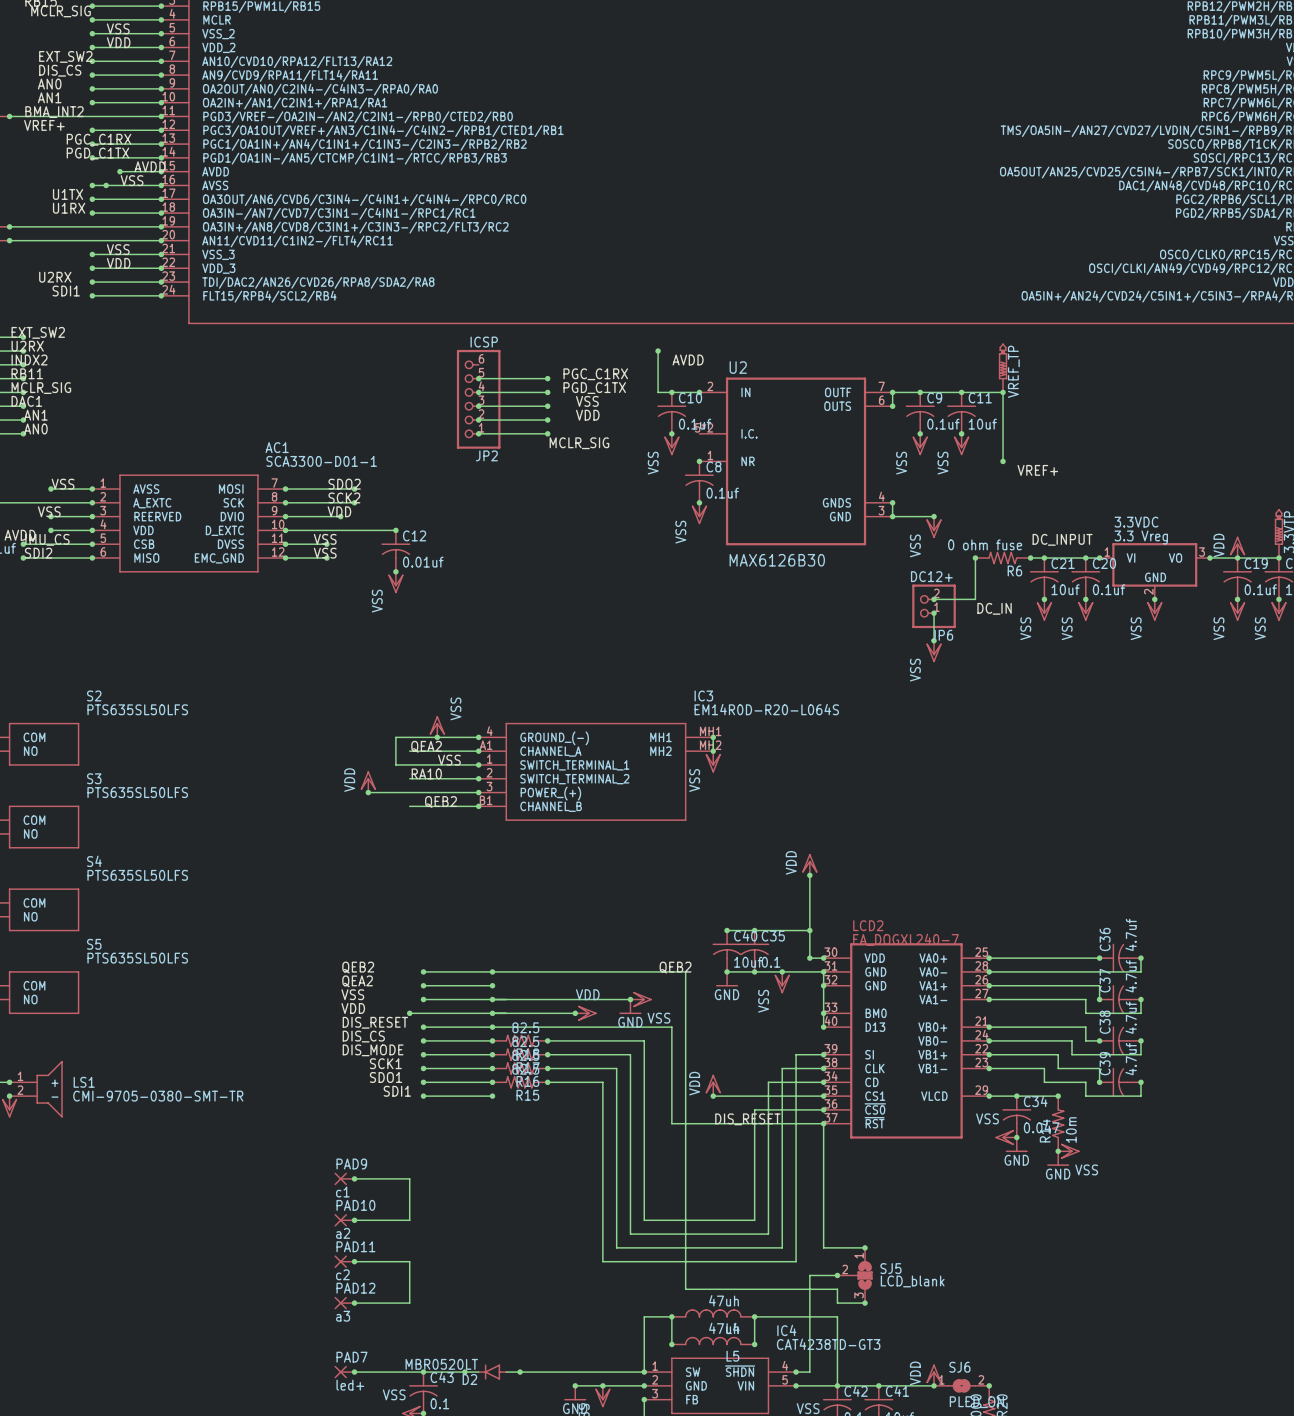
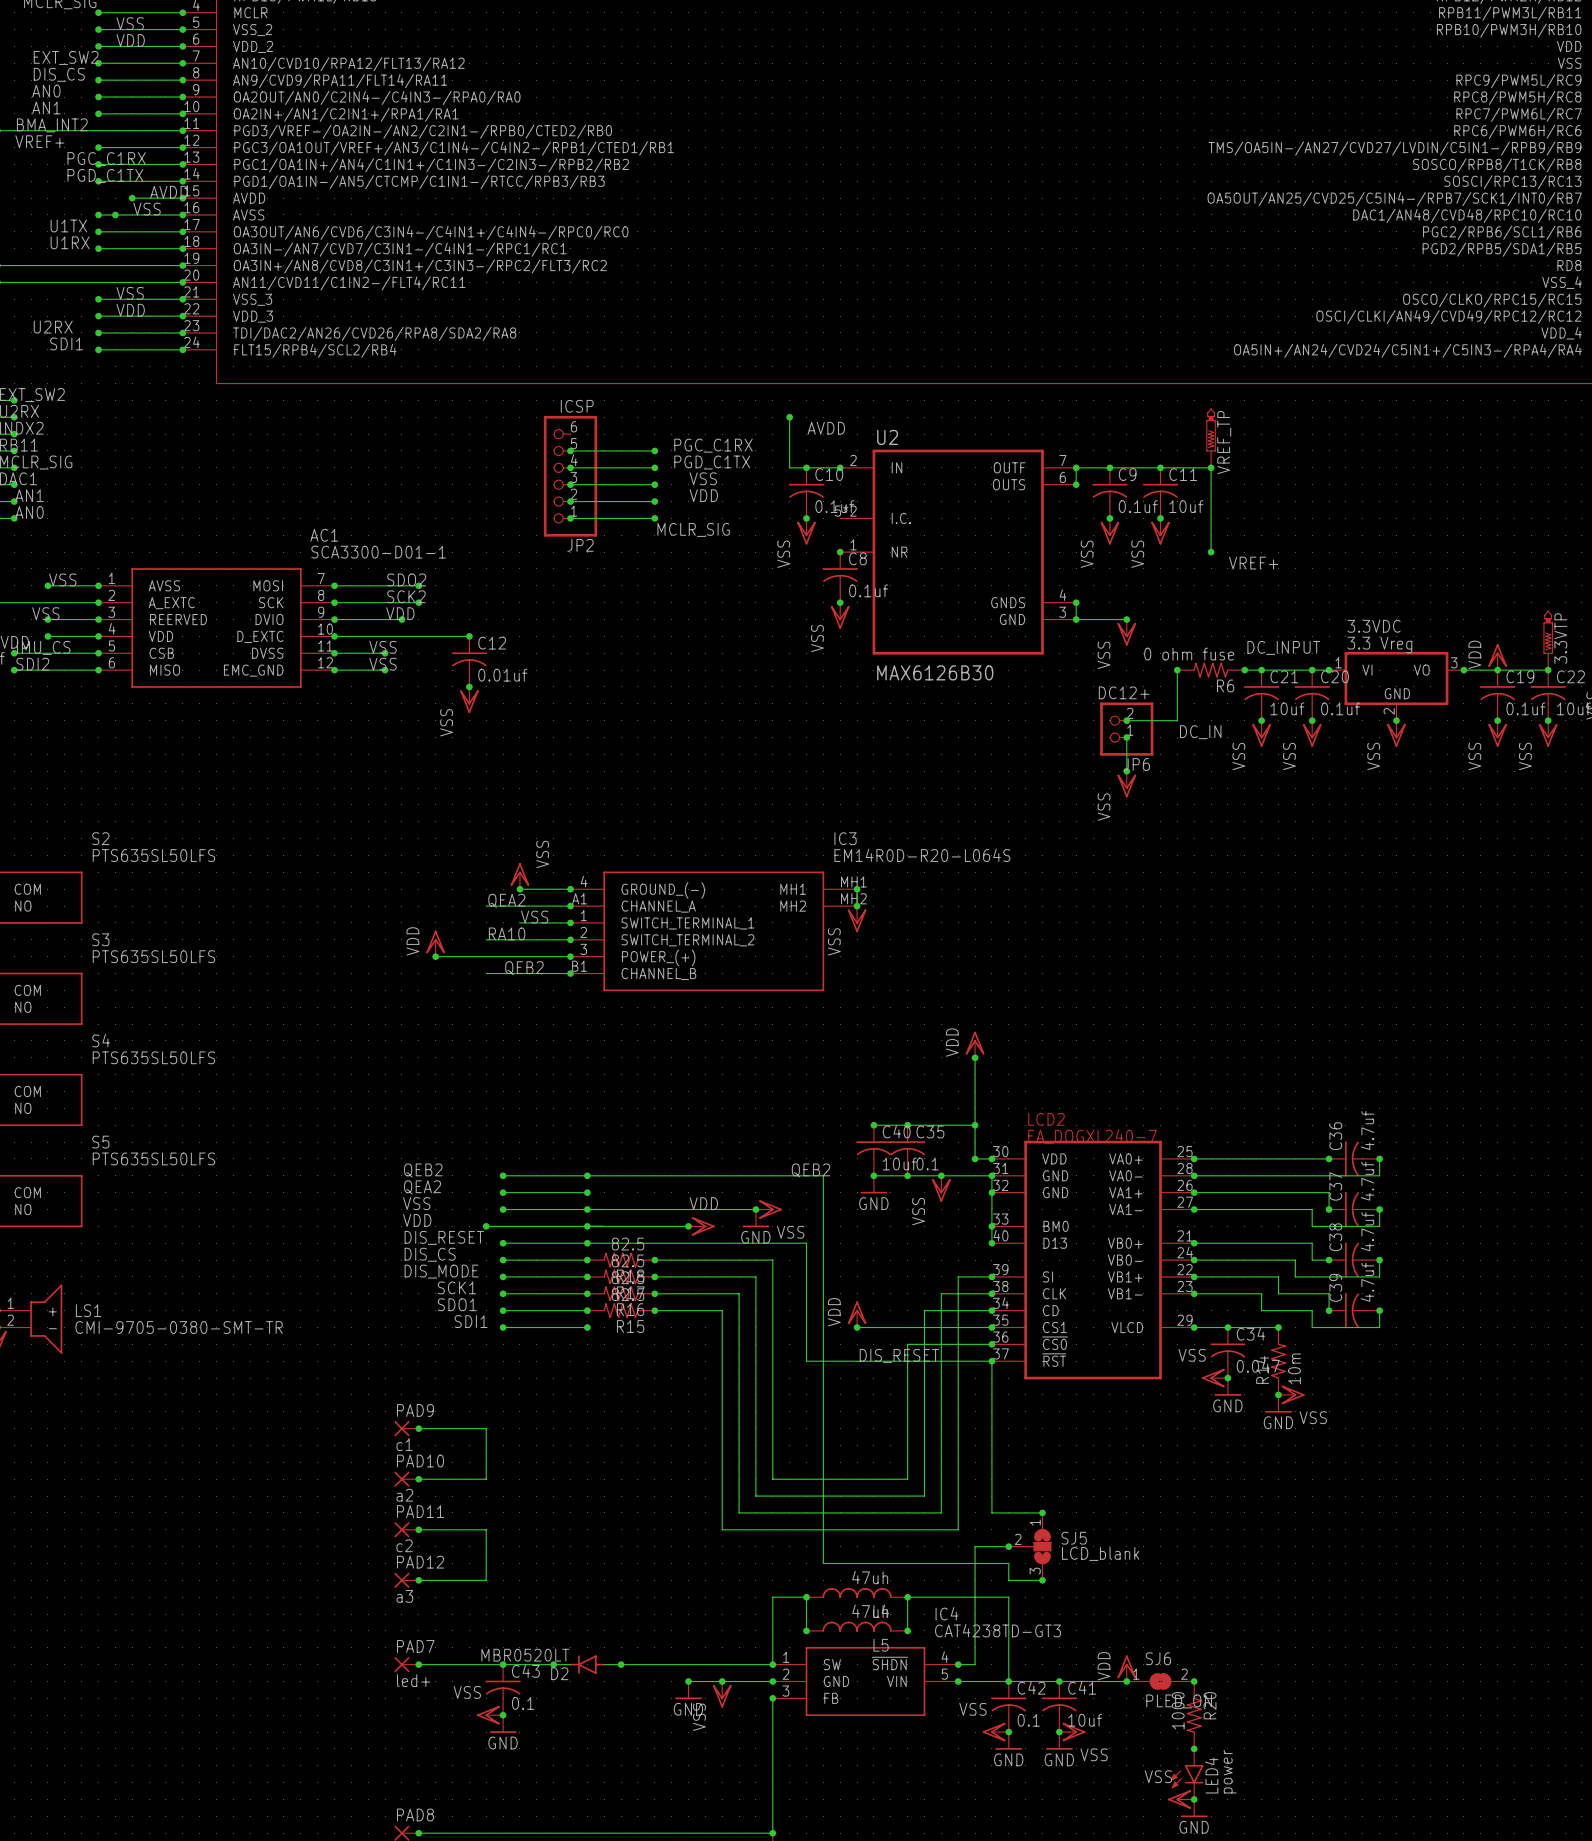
wire: (437, 737) (395, 737) (395, 764) (437, 764) -> none

